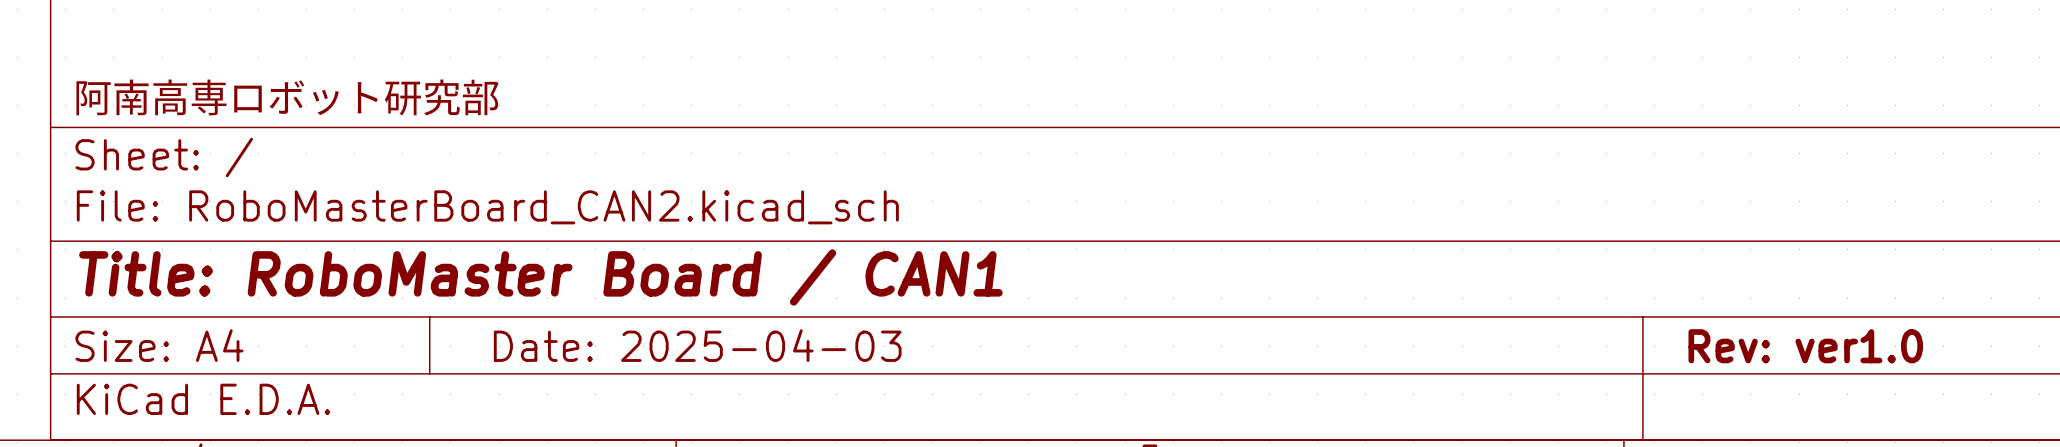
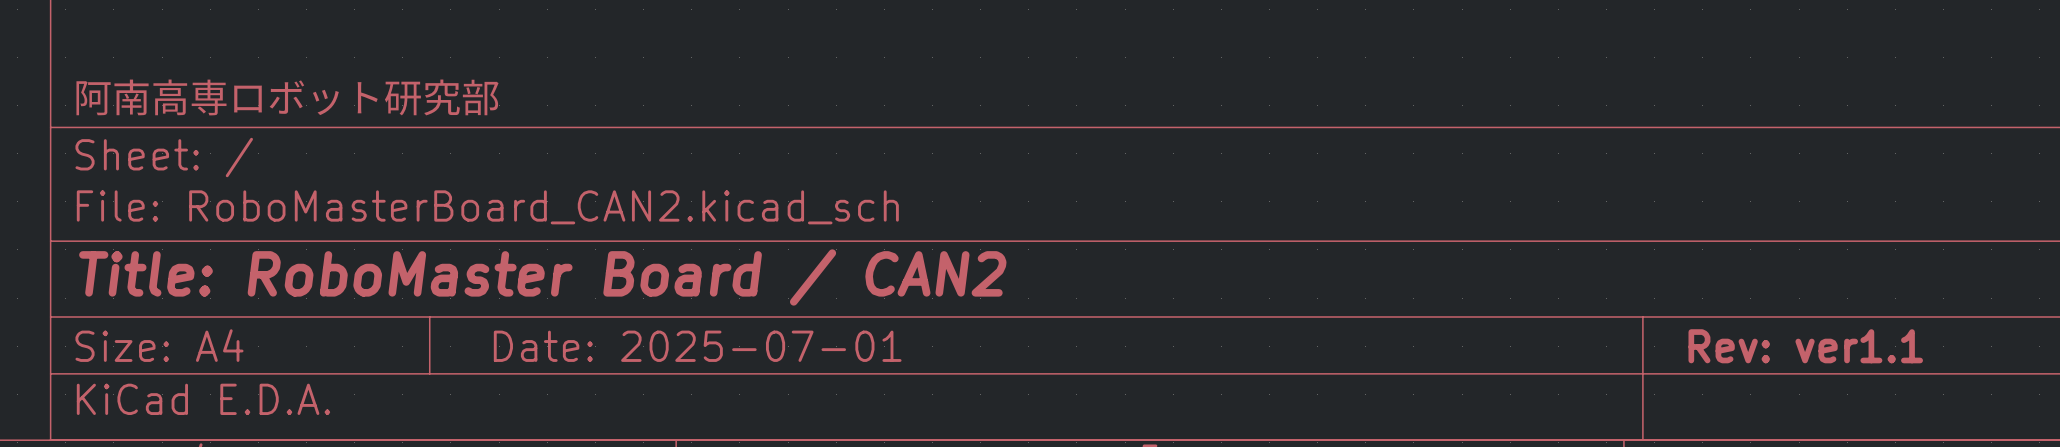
title block: Title: RoboMaster Board / CAN1 (540, 277) -> Title: RoboMaster Board / CAN2 (542, 277)
title block: Date: 2025-04-03 (697, 345) -> Date: 2025-07-01 (697, 346)
title block: Rev: ver1.0 (1805, 346) -> Rev: ver1.1 (1805, 346)

